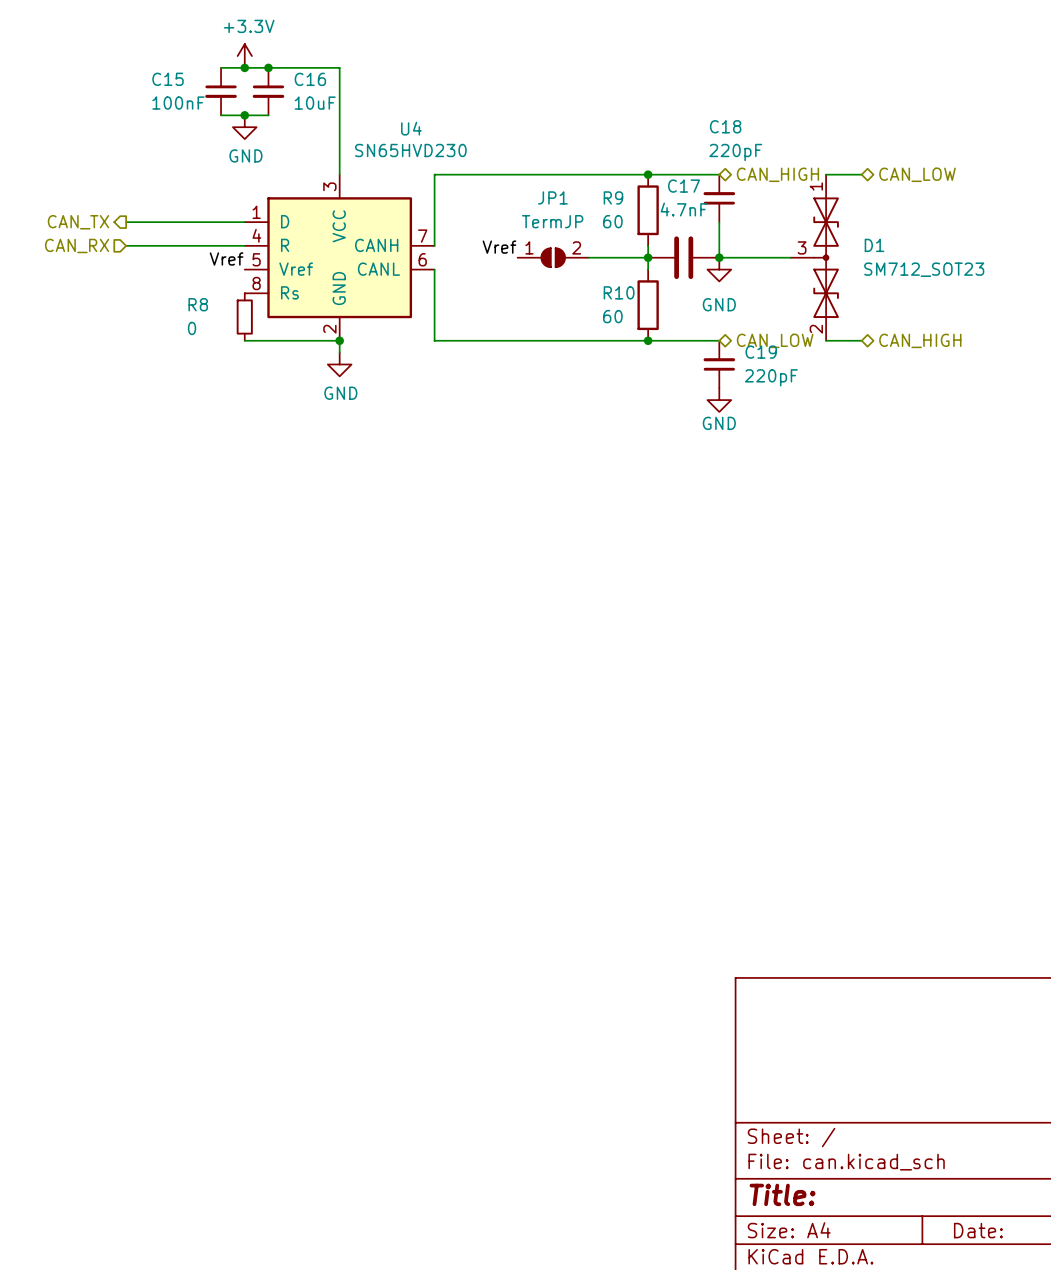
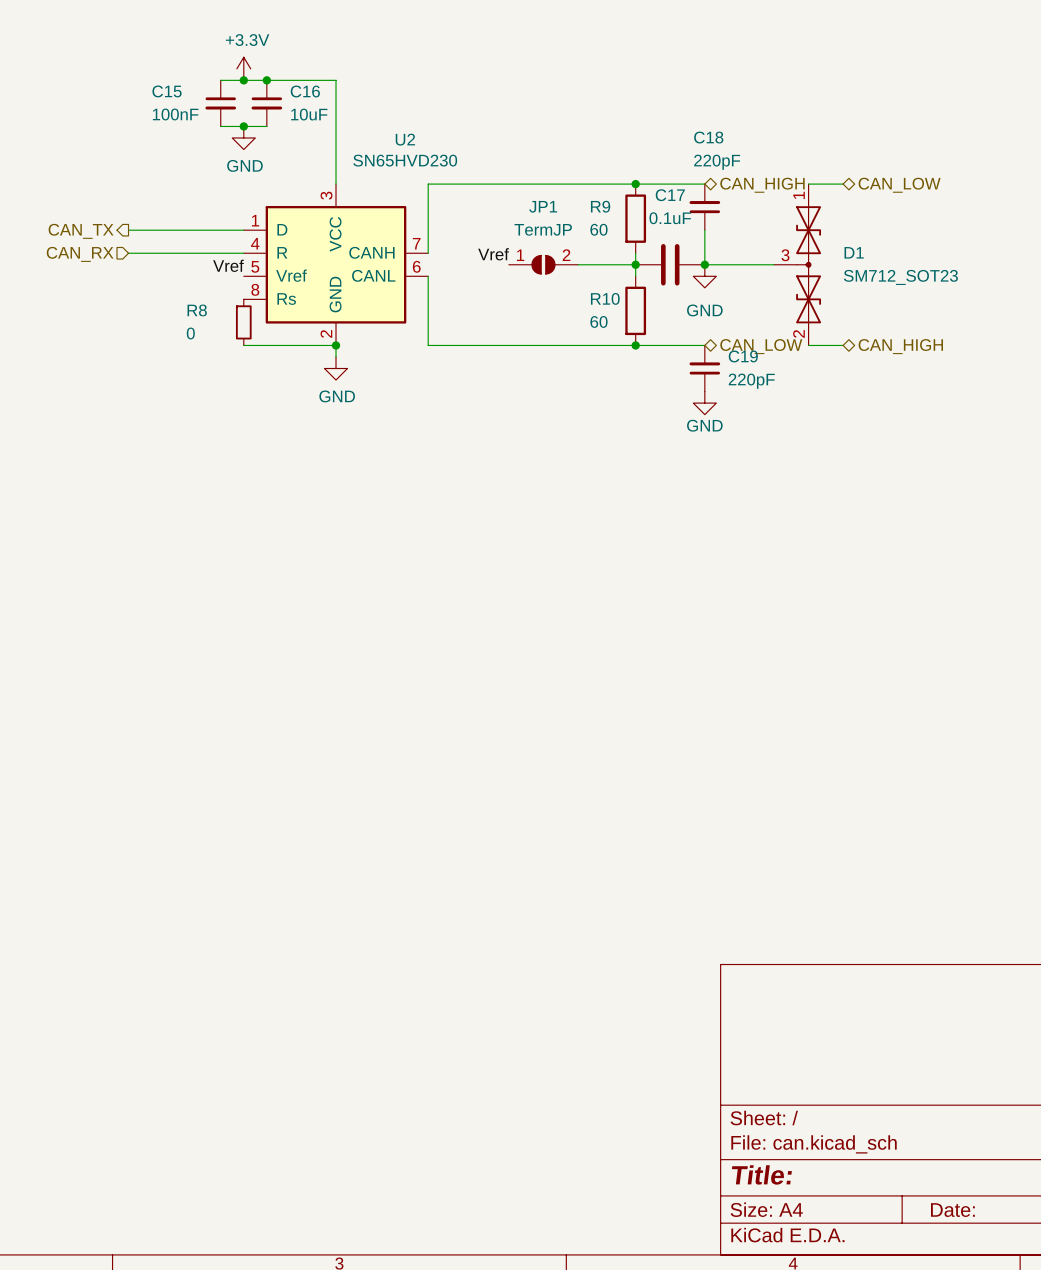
U4 name: U4 (411, 128) -> U2 (405, 139)
C17 value: 4.7nF (684, 209) -> 0.1uF (670, 218)

